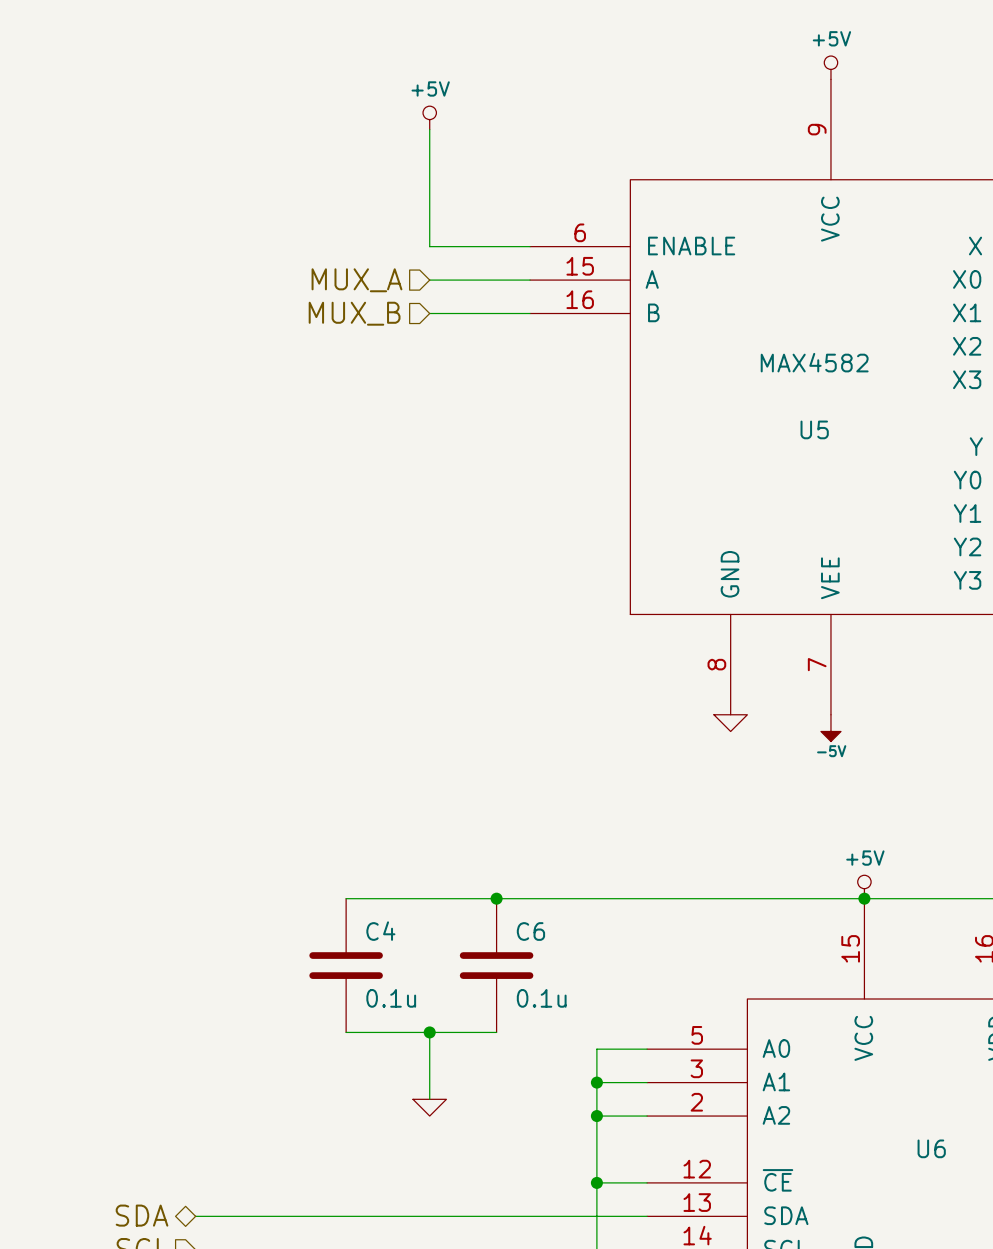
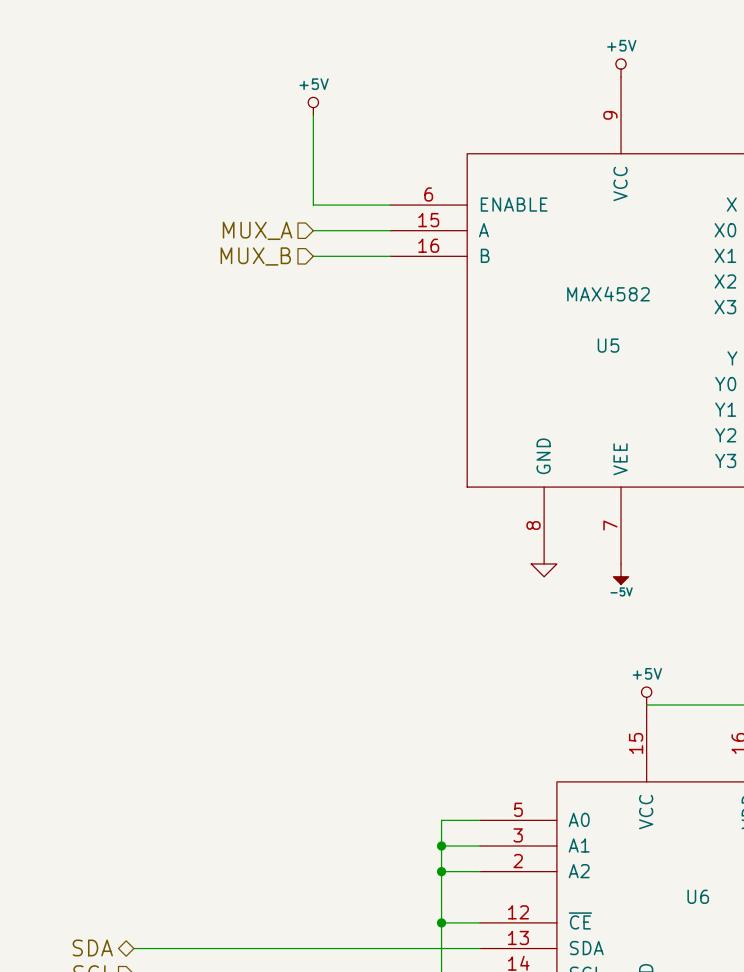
wire: (346, 898) (864, 898) -> none
junction: (496, 898) -> none
junction: (864, 898) -> none
C4: 0.1u (346, 965) -> none
C6: 0.1u (496, 965) -> none
wire: (346, 1032) (496, 1032) -> none
wire: (429, 1032) (429, 1099) -> none
junction: (429, 1032) -> none
power symbol: (429, 1107) -> none

